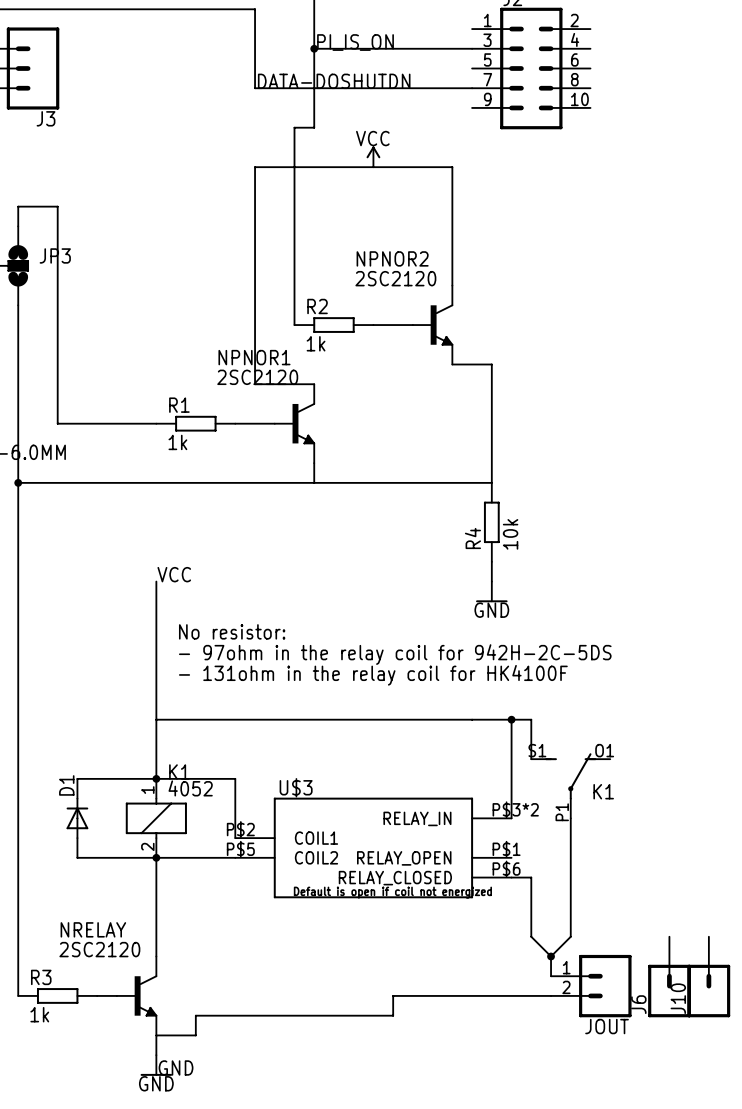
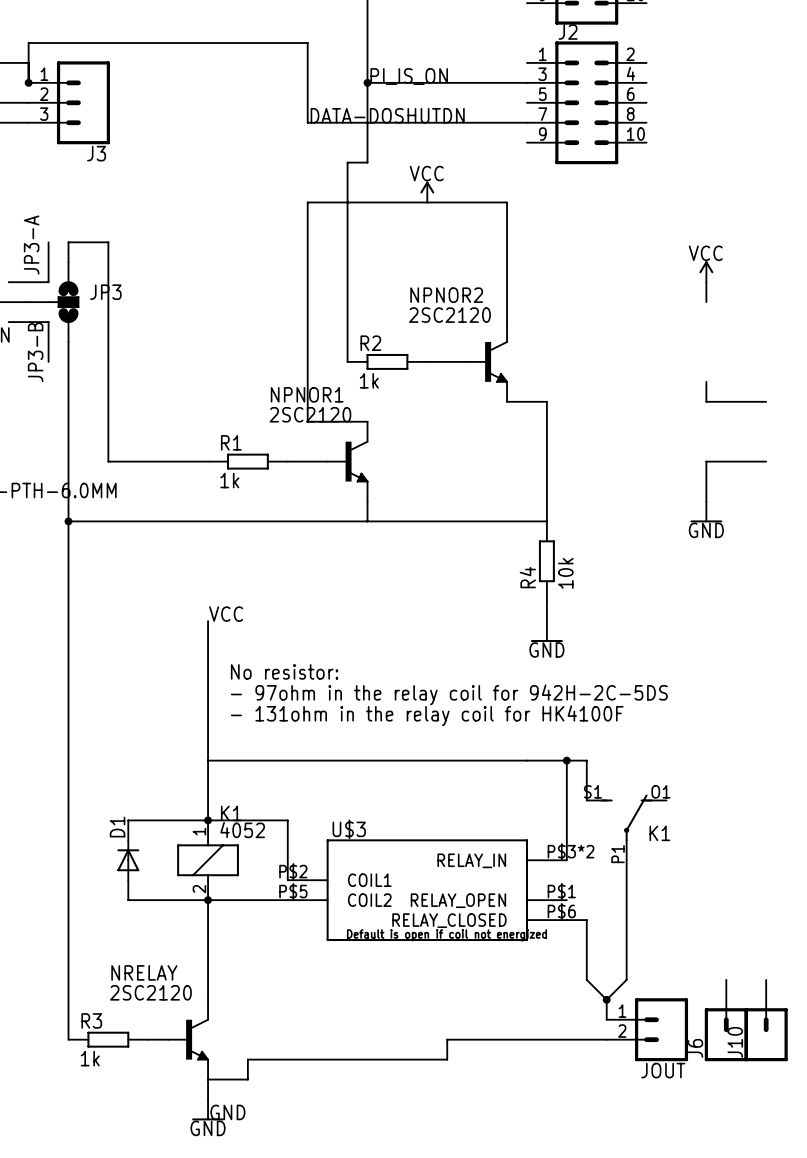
power symbol: none -> VCC (706, 271)
wire: none -> (706, 282) (706, 302)
wire: none -> (706, 381) (706, 401) (766, 401)
wire: none -> (766, 461) (706, 461) (706, 501)
power symbol: none -> GND (706, 511)

